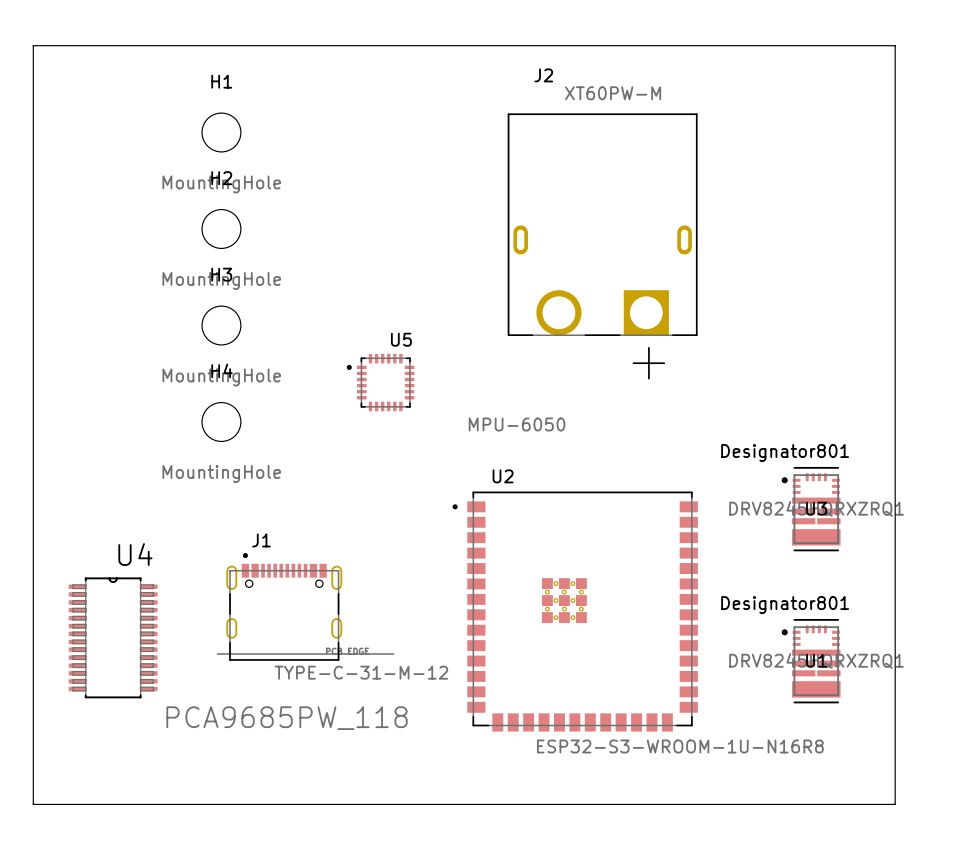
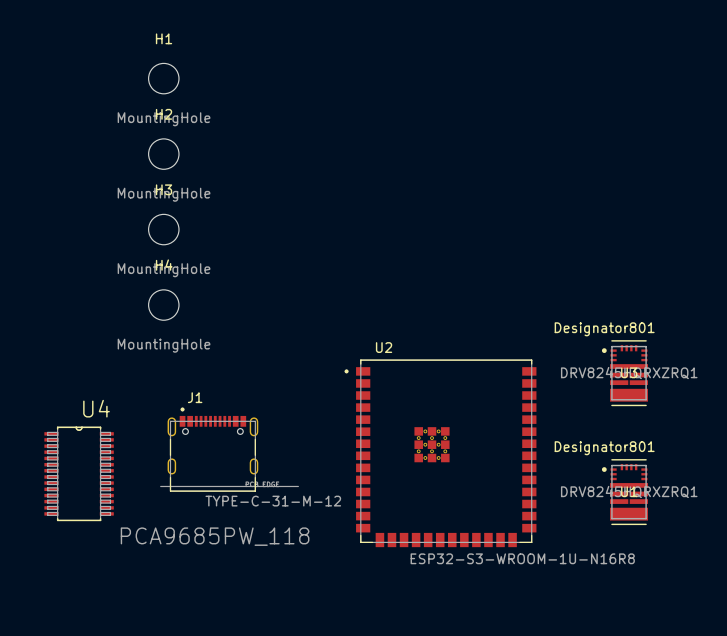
board edge: (33, 45) (895, 45) (895, 804) (33, 804) (33, 45) -> none
J2: XT60PW-M (602, 246) -> none
U5: MPU-6050 (380, 382) -> none

